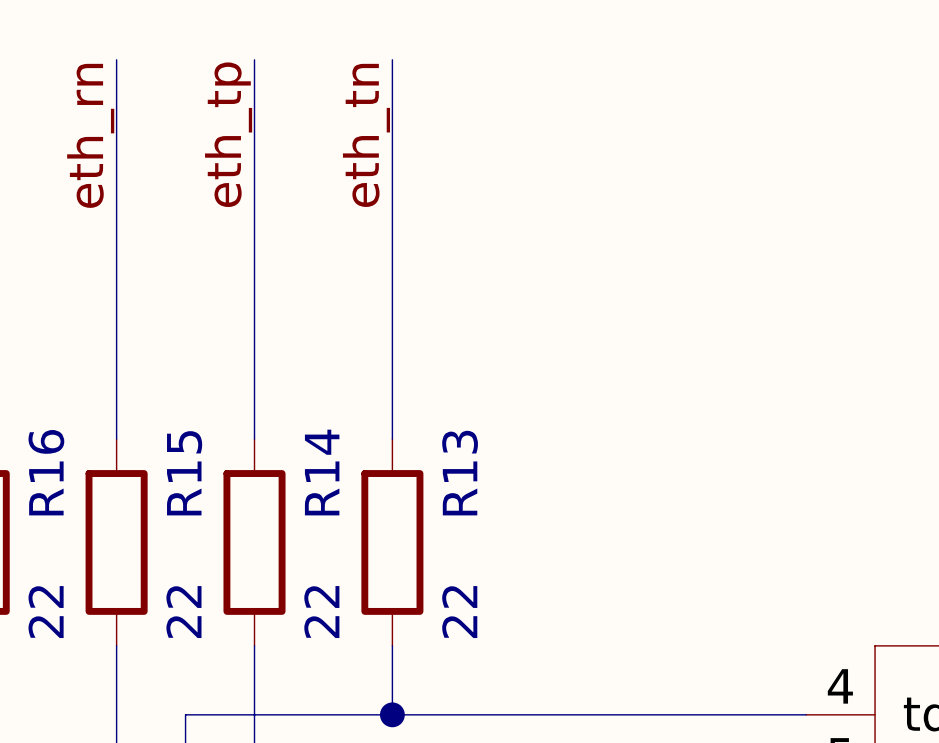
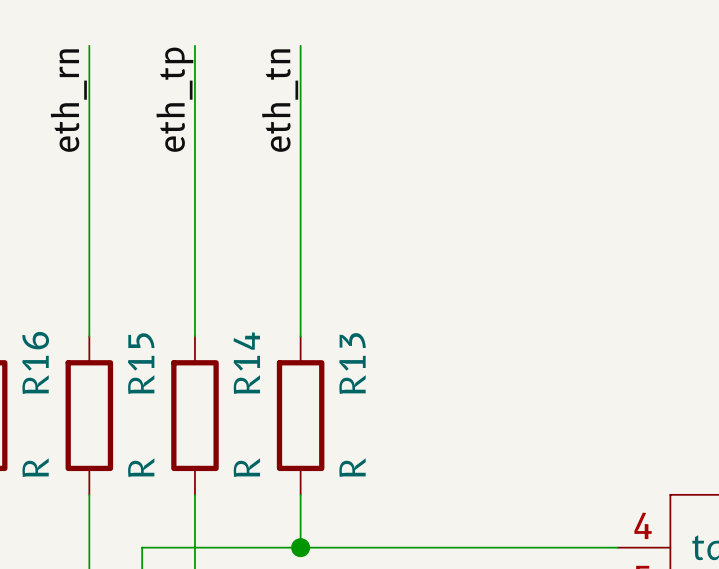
R16 value: 22 (46, 612) -> R (35, 467)
R15 value: 22 (183, 612) -> R (141, 467)
R14 value: 22 (321, 612) -> R (246, 467)
R13 value: 22 (459, 612) -> R (352, 467)

